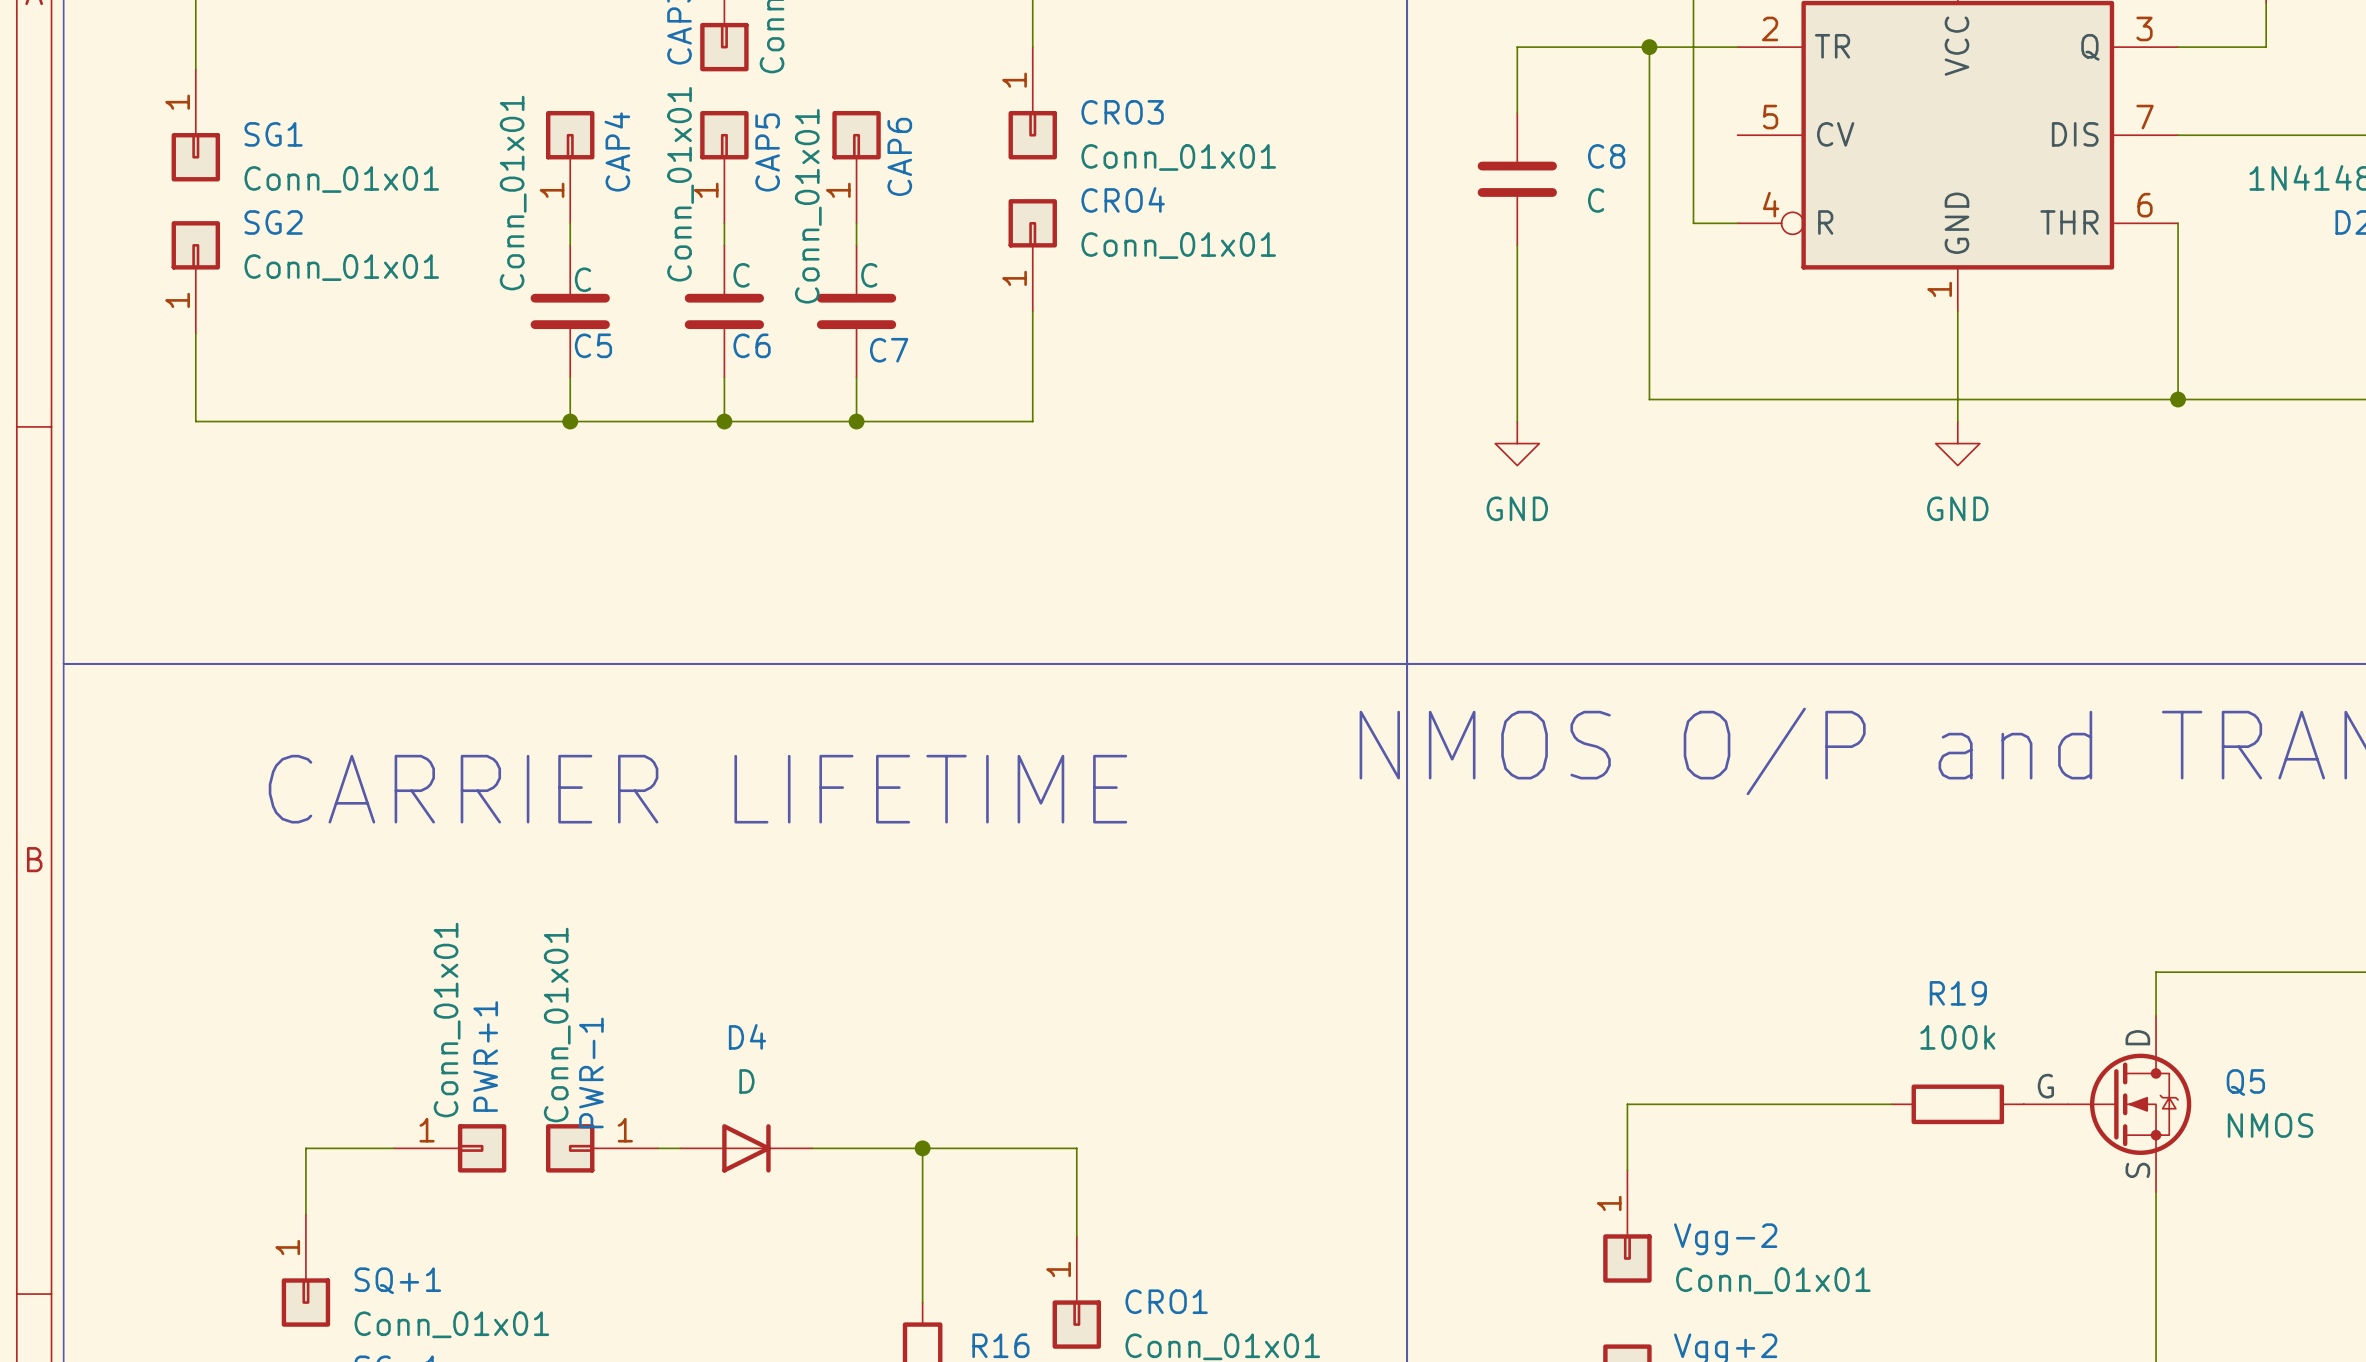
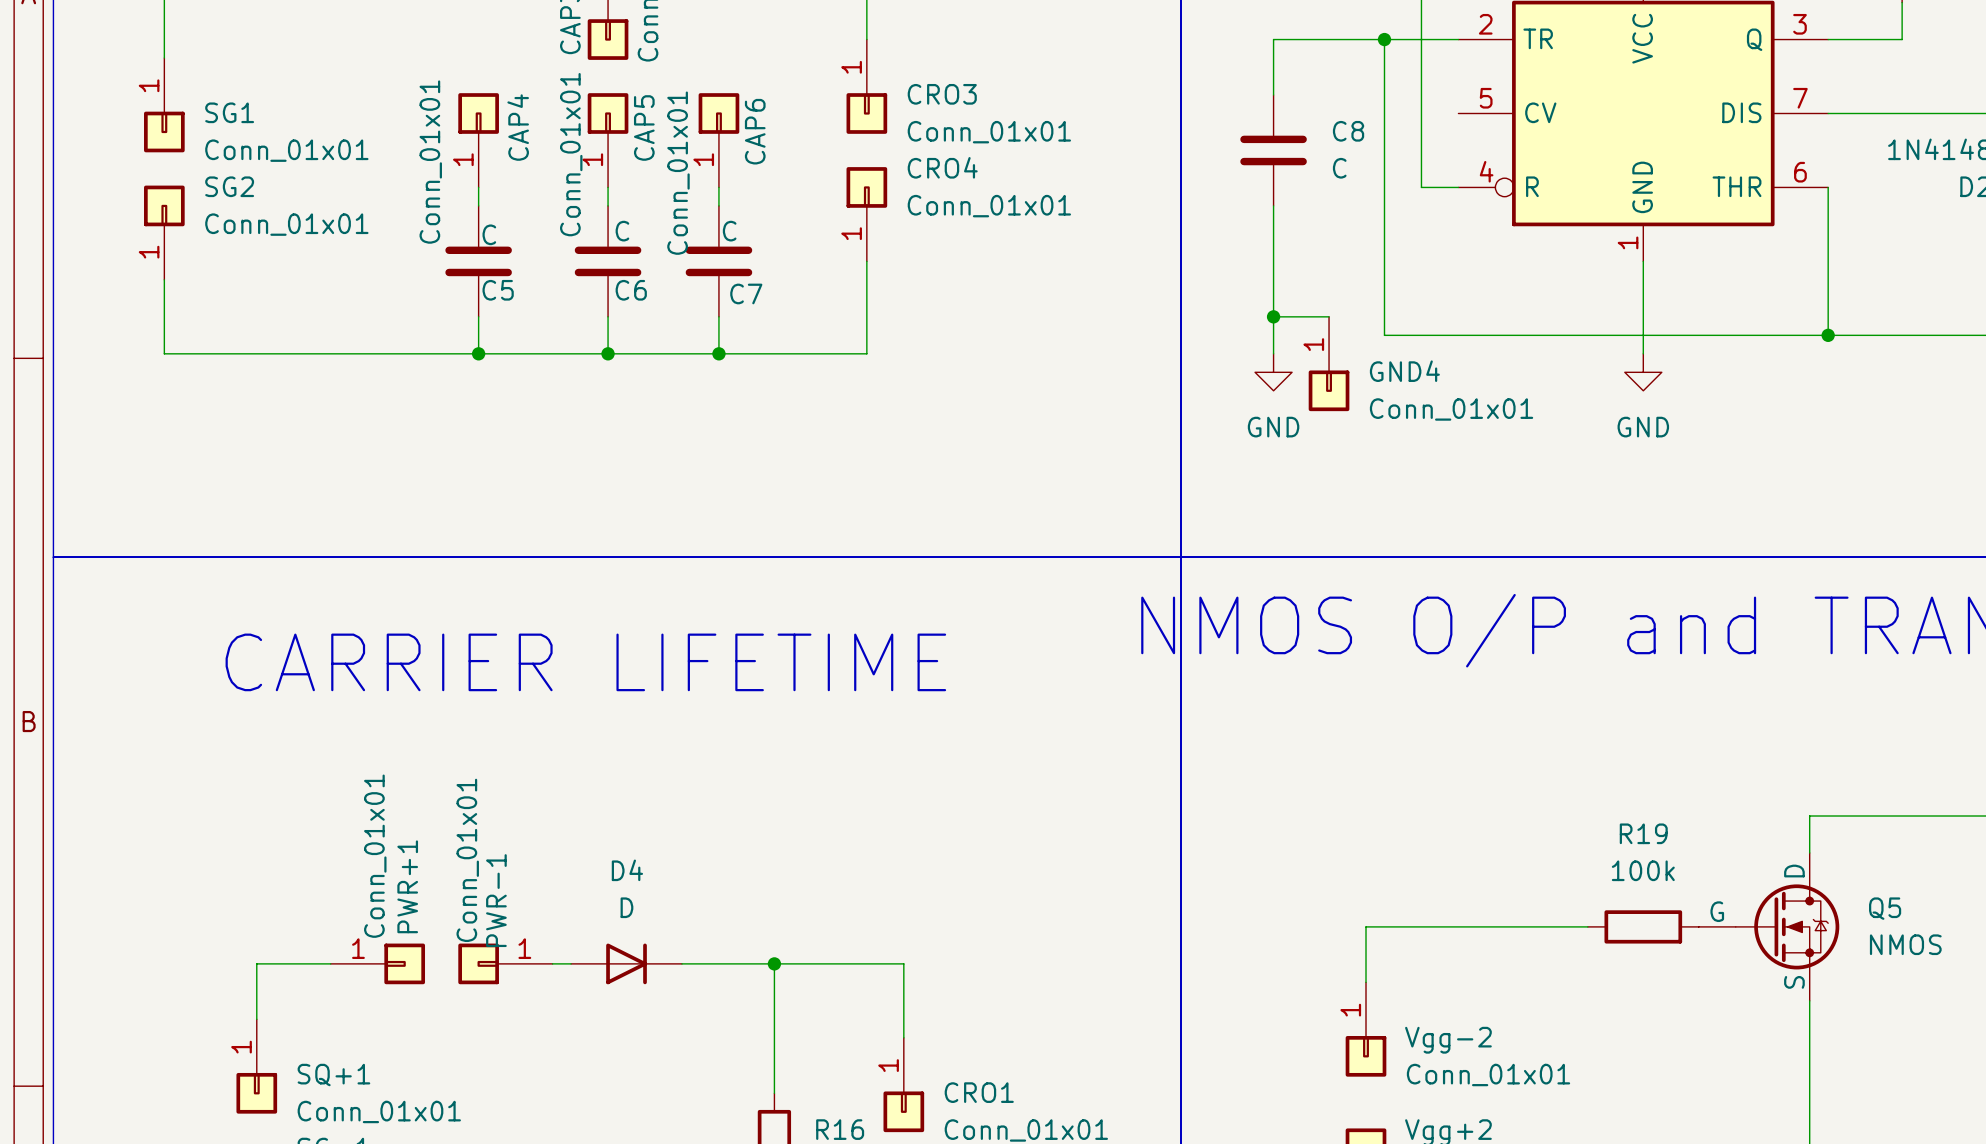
wire: none -> (1273, 316) (1329, 316)
junction: none -> (1273, 316)
GND4: none -> Conn_01x01 (1329, 363)

